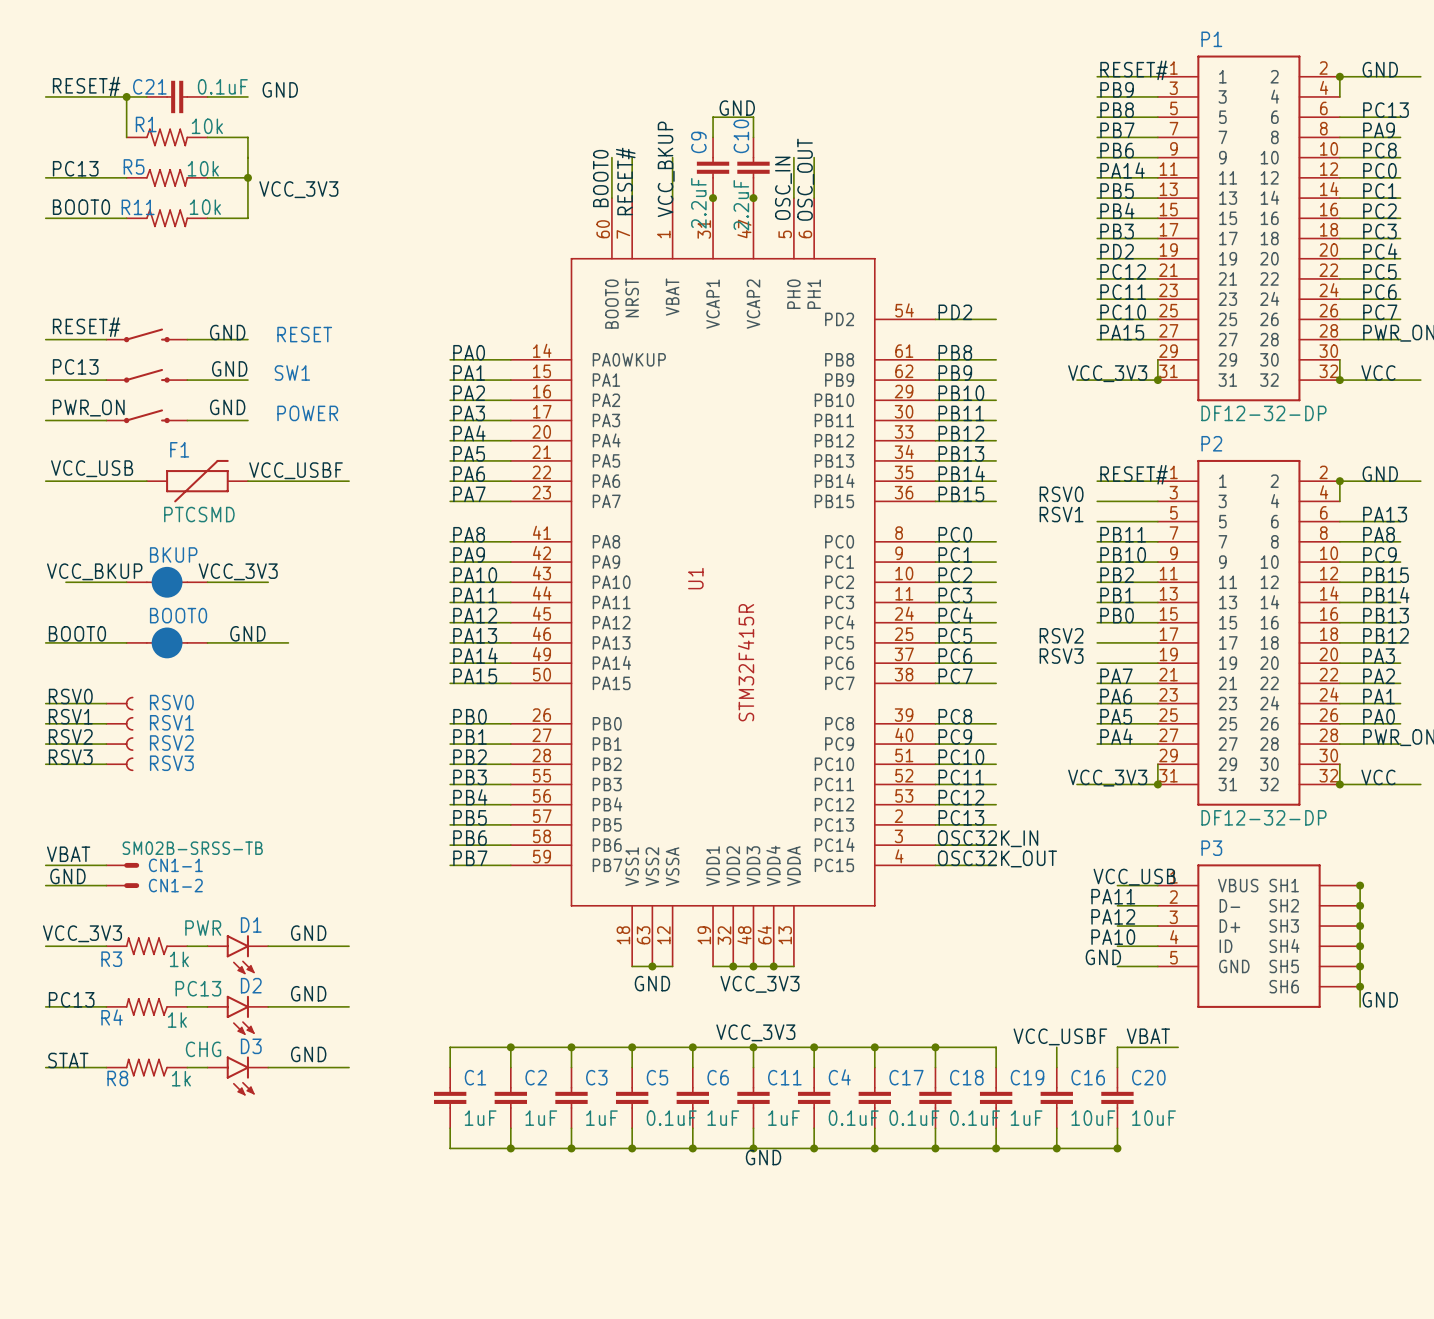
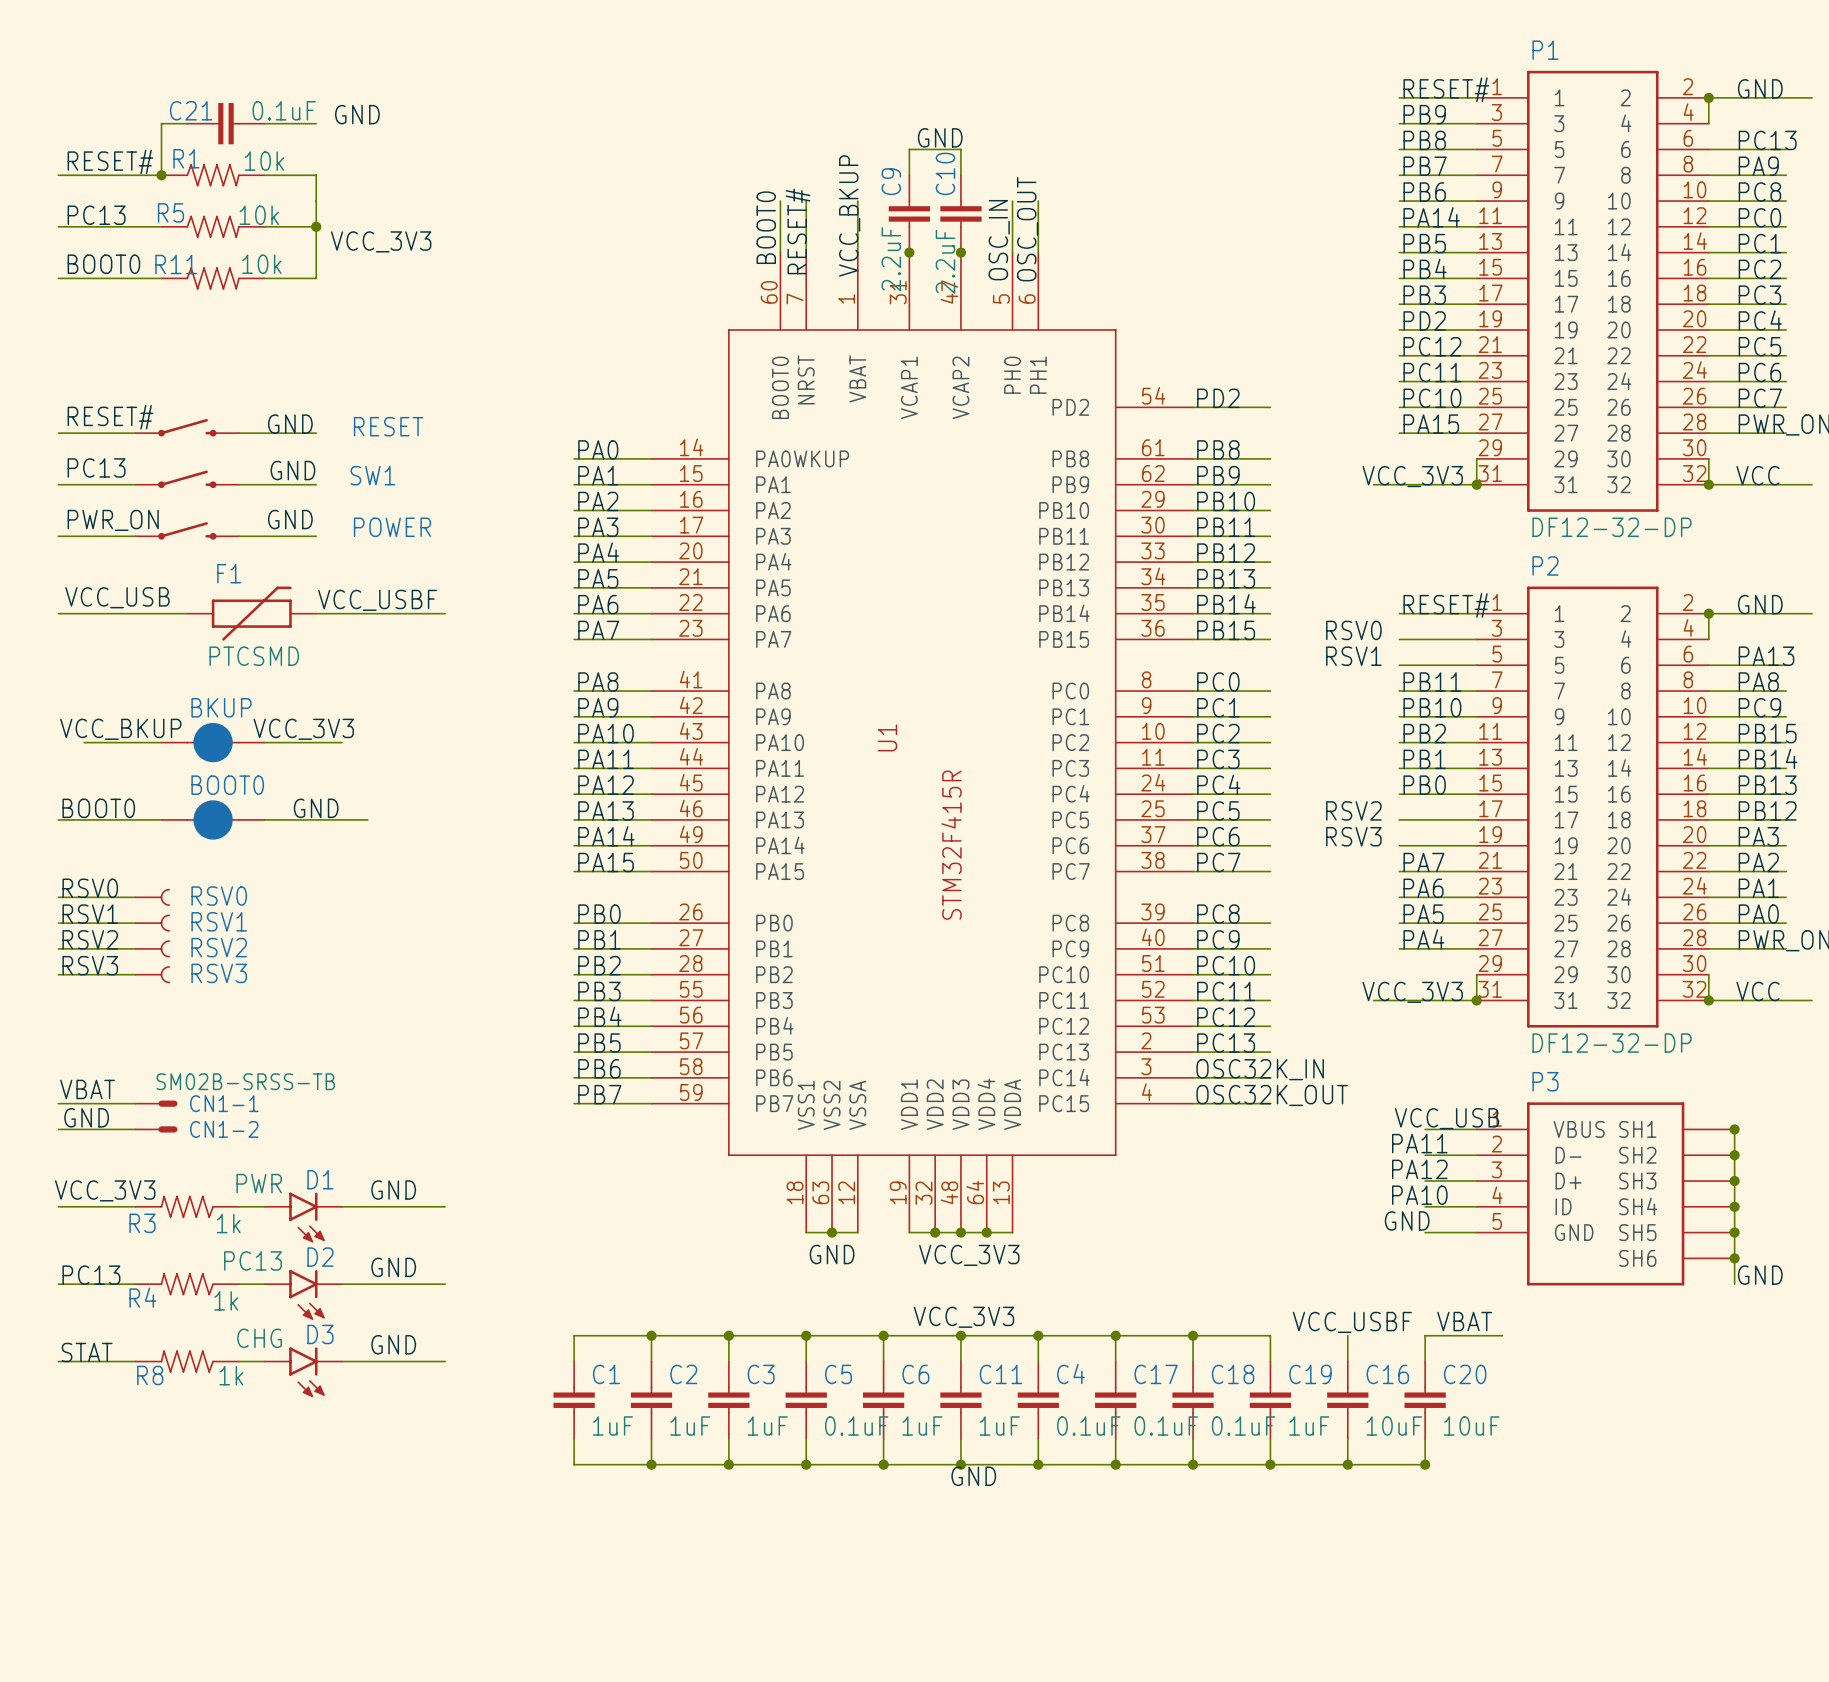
label position: RESET# (86, 86) -> RESET# (110, 161)
wire: (45, 96) (126, 96) -> (58, 175) (161, 175)
junction position: (126, 96) -> (161, 175)

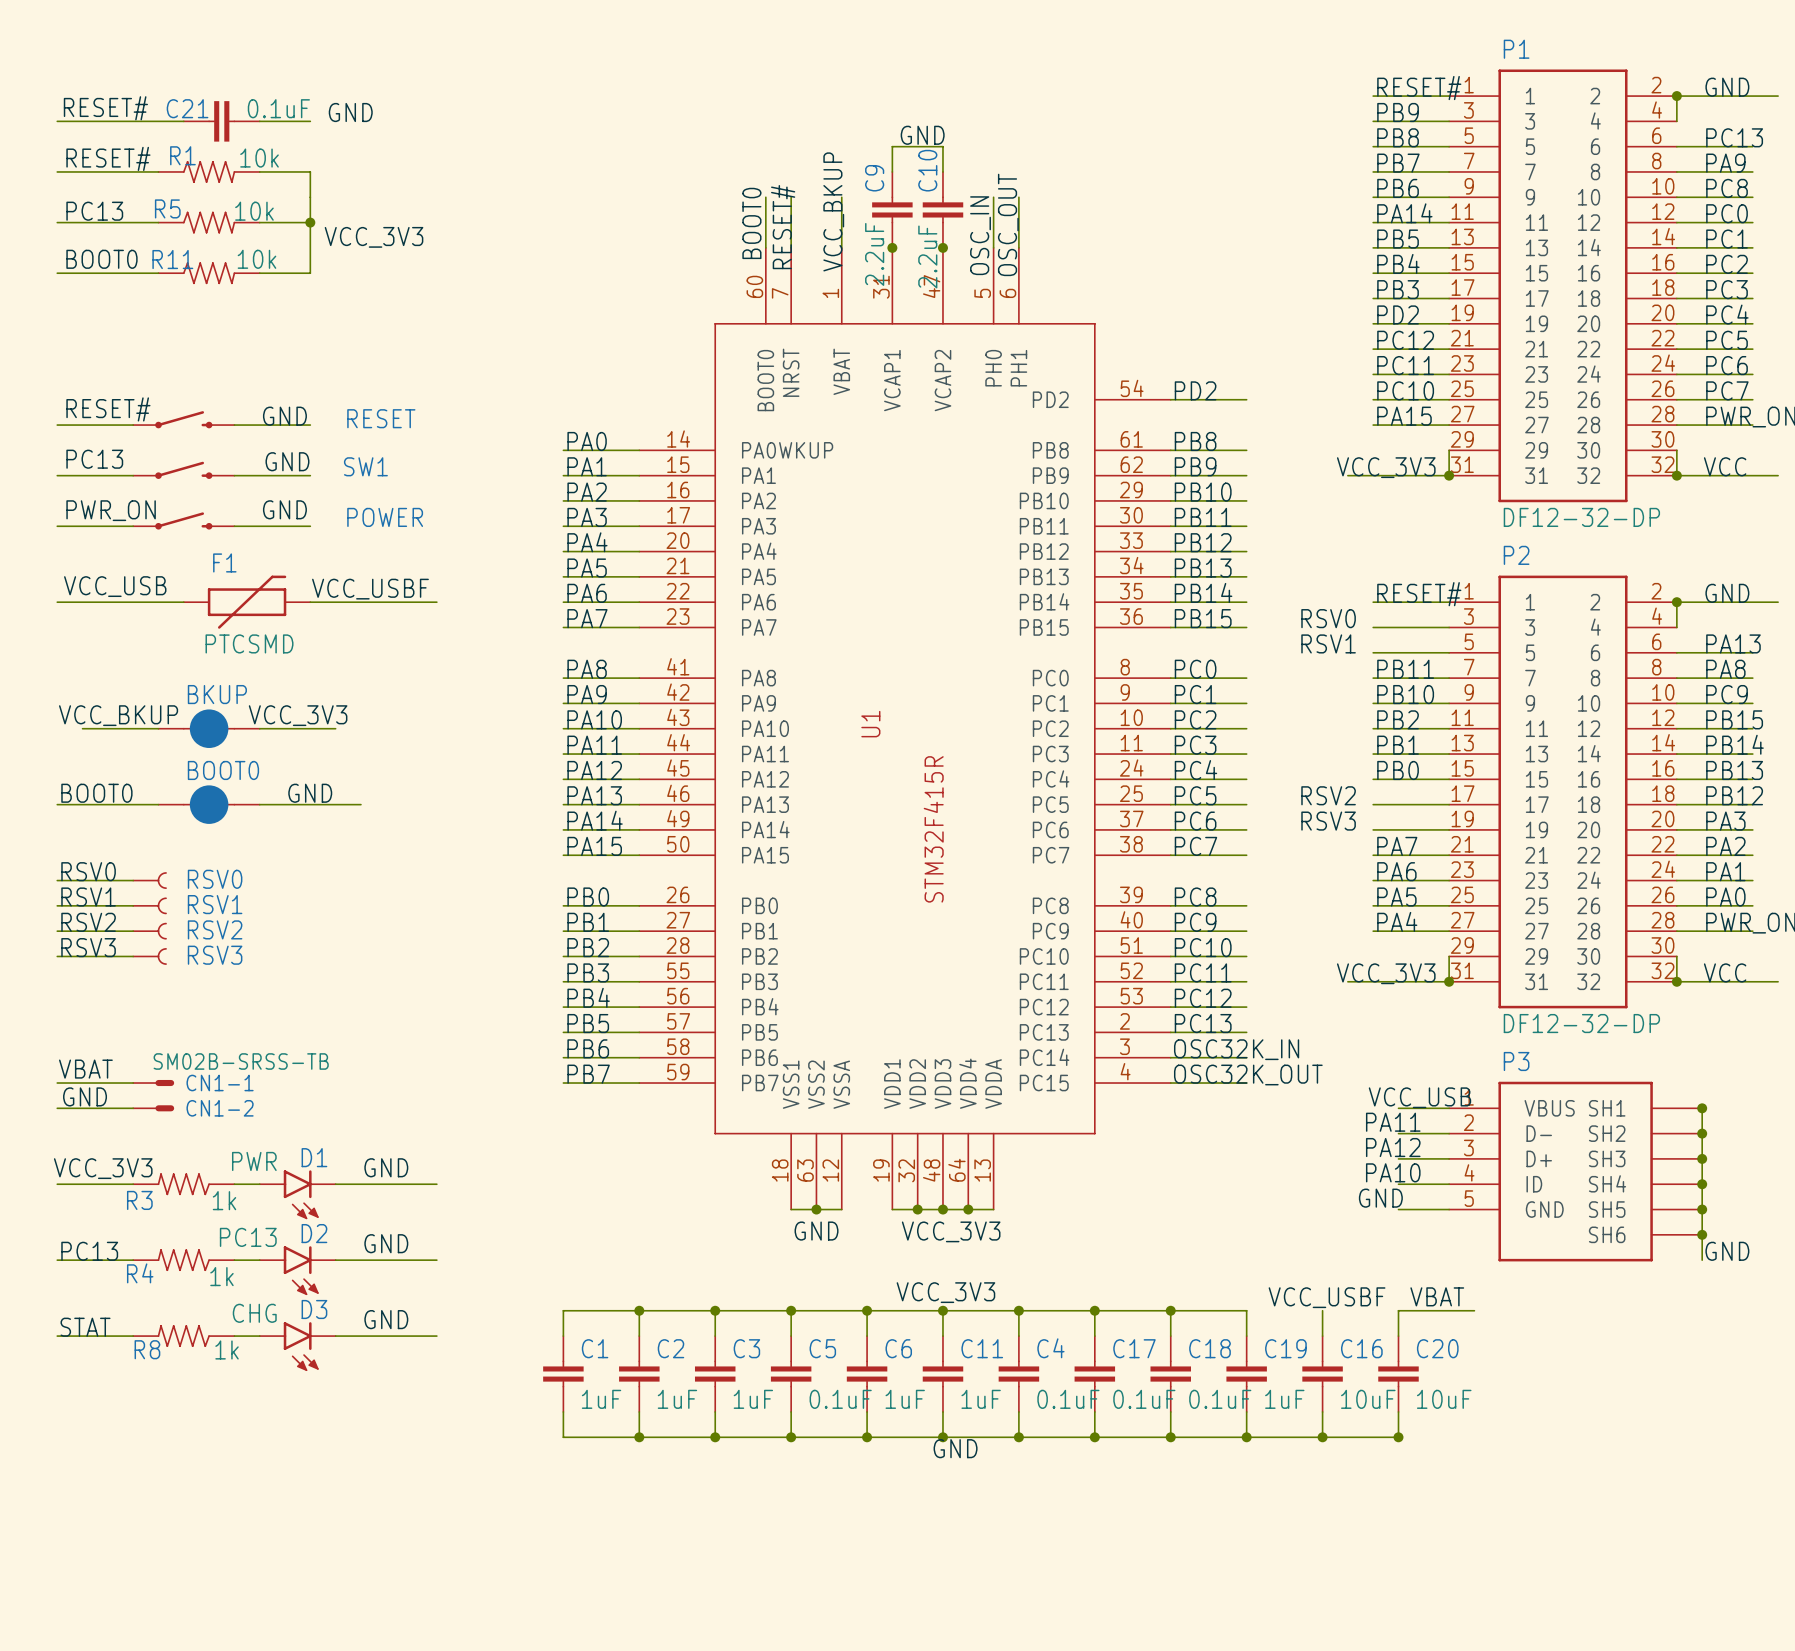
label: none -> RESET# (105, 108)
wire: (161, 123) (161, 175) -> (158, 121) (57, 121)
junction: (161, 175) -> none

